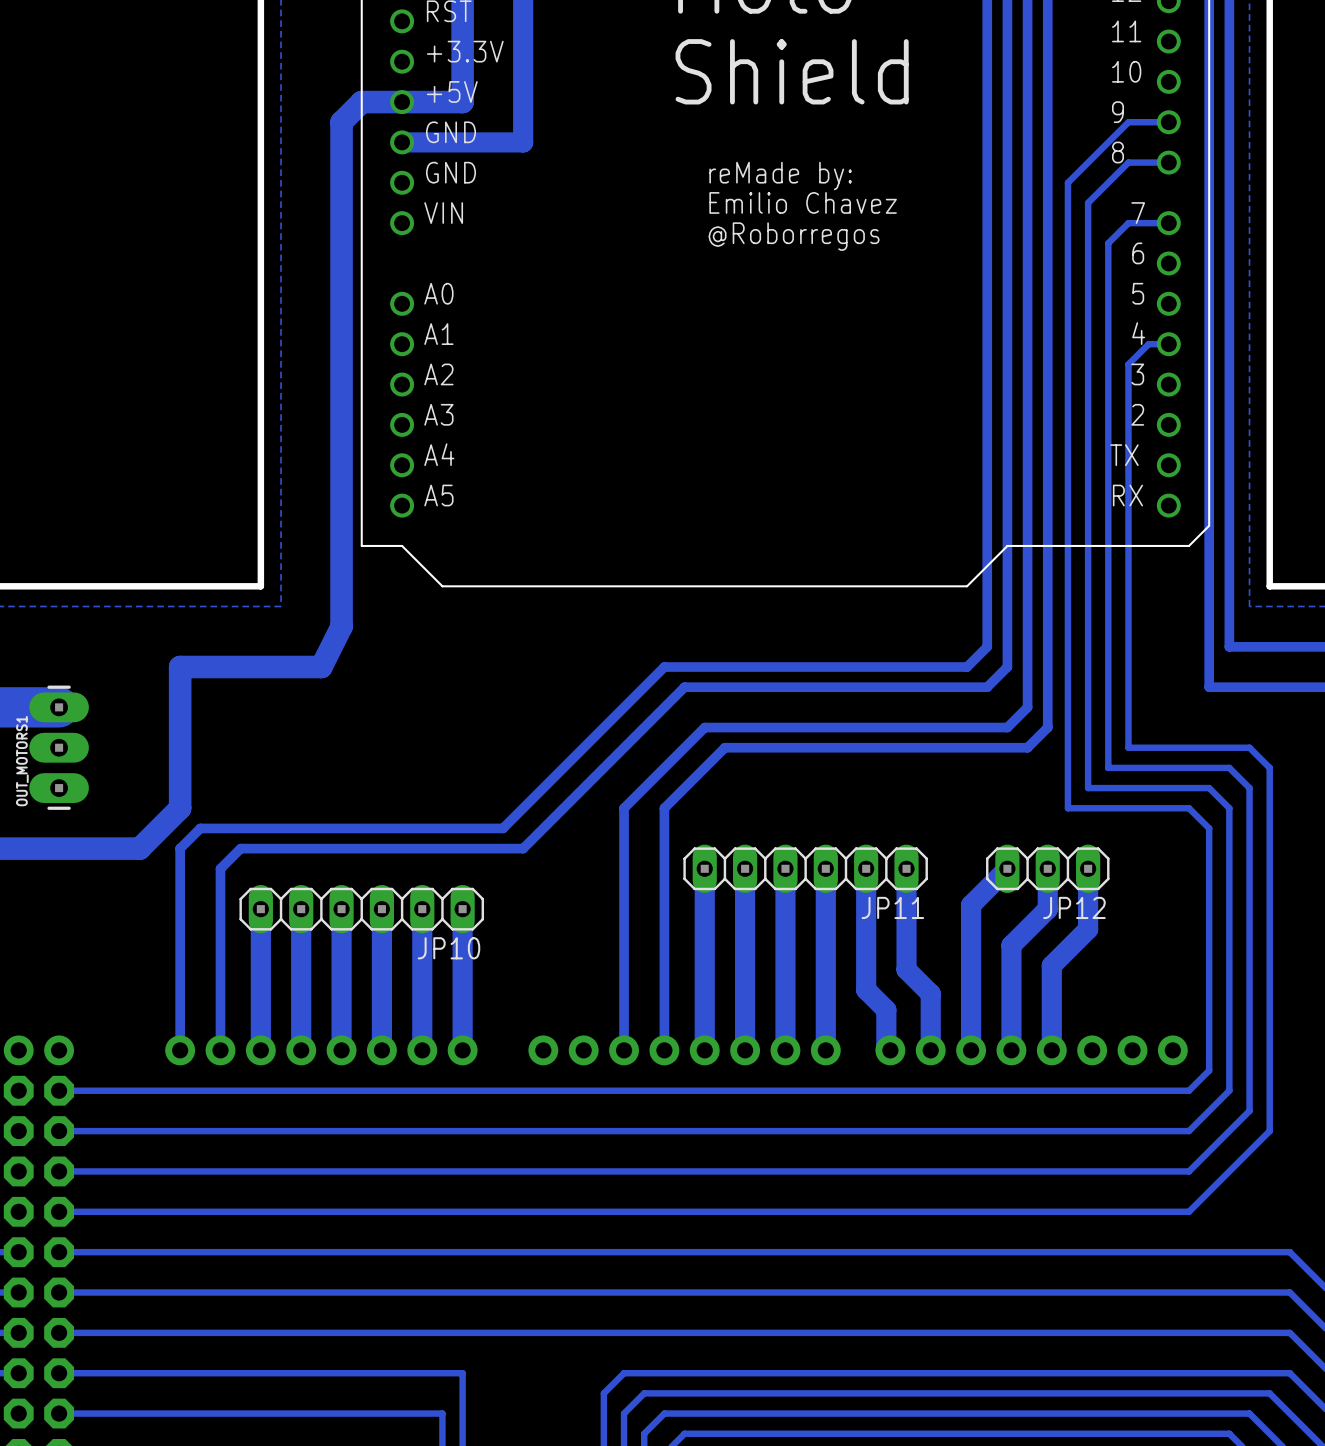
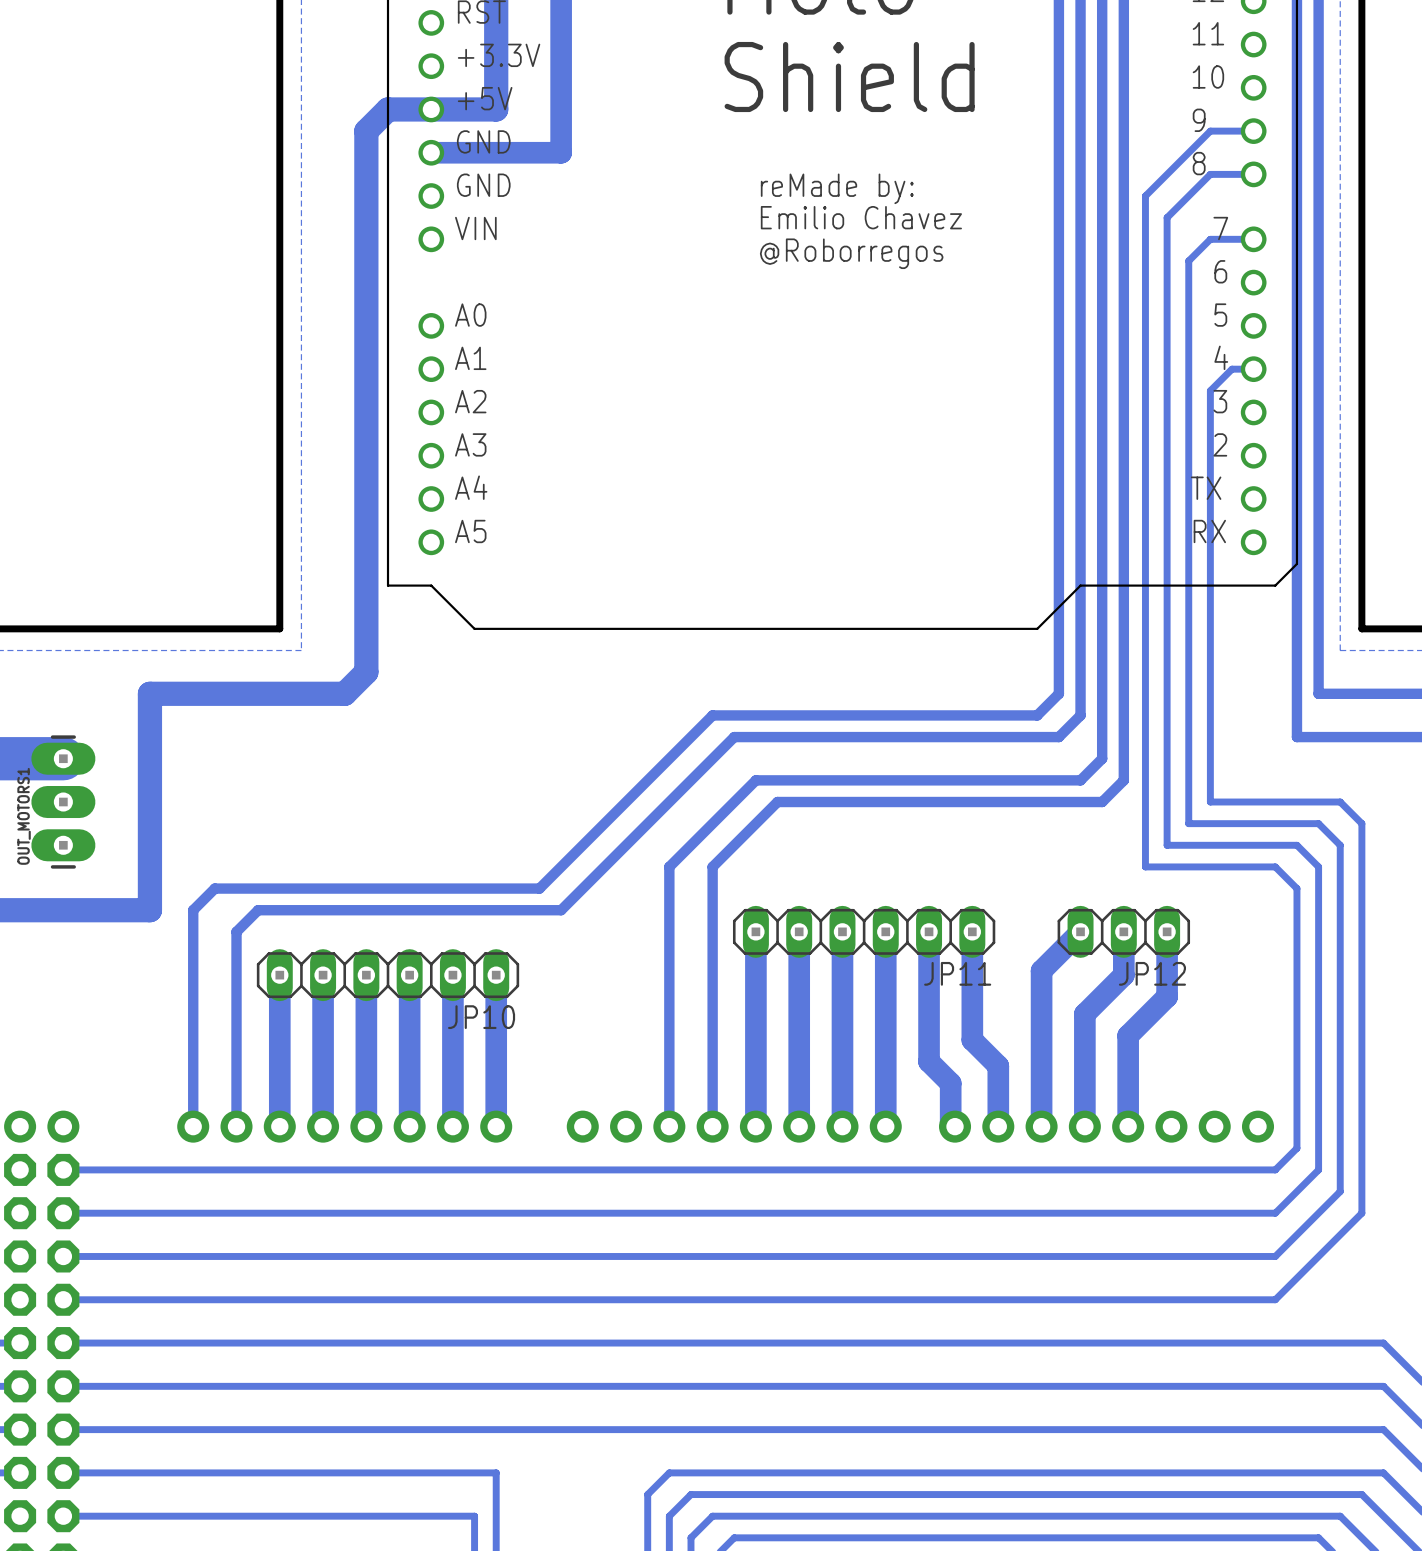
bottom track: (341, 626) (321, 667) (180, 667) (180, 808) (139, 848) -> (366, 672) (344, 693) (149, 693) (149, 910)

